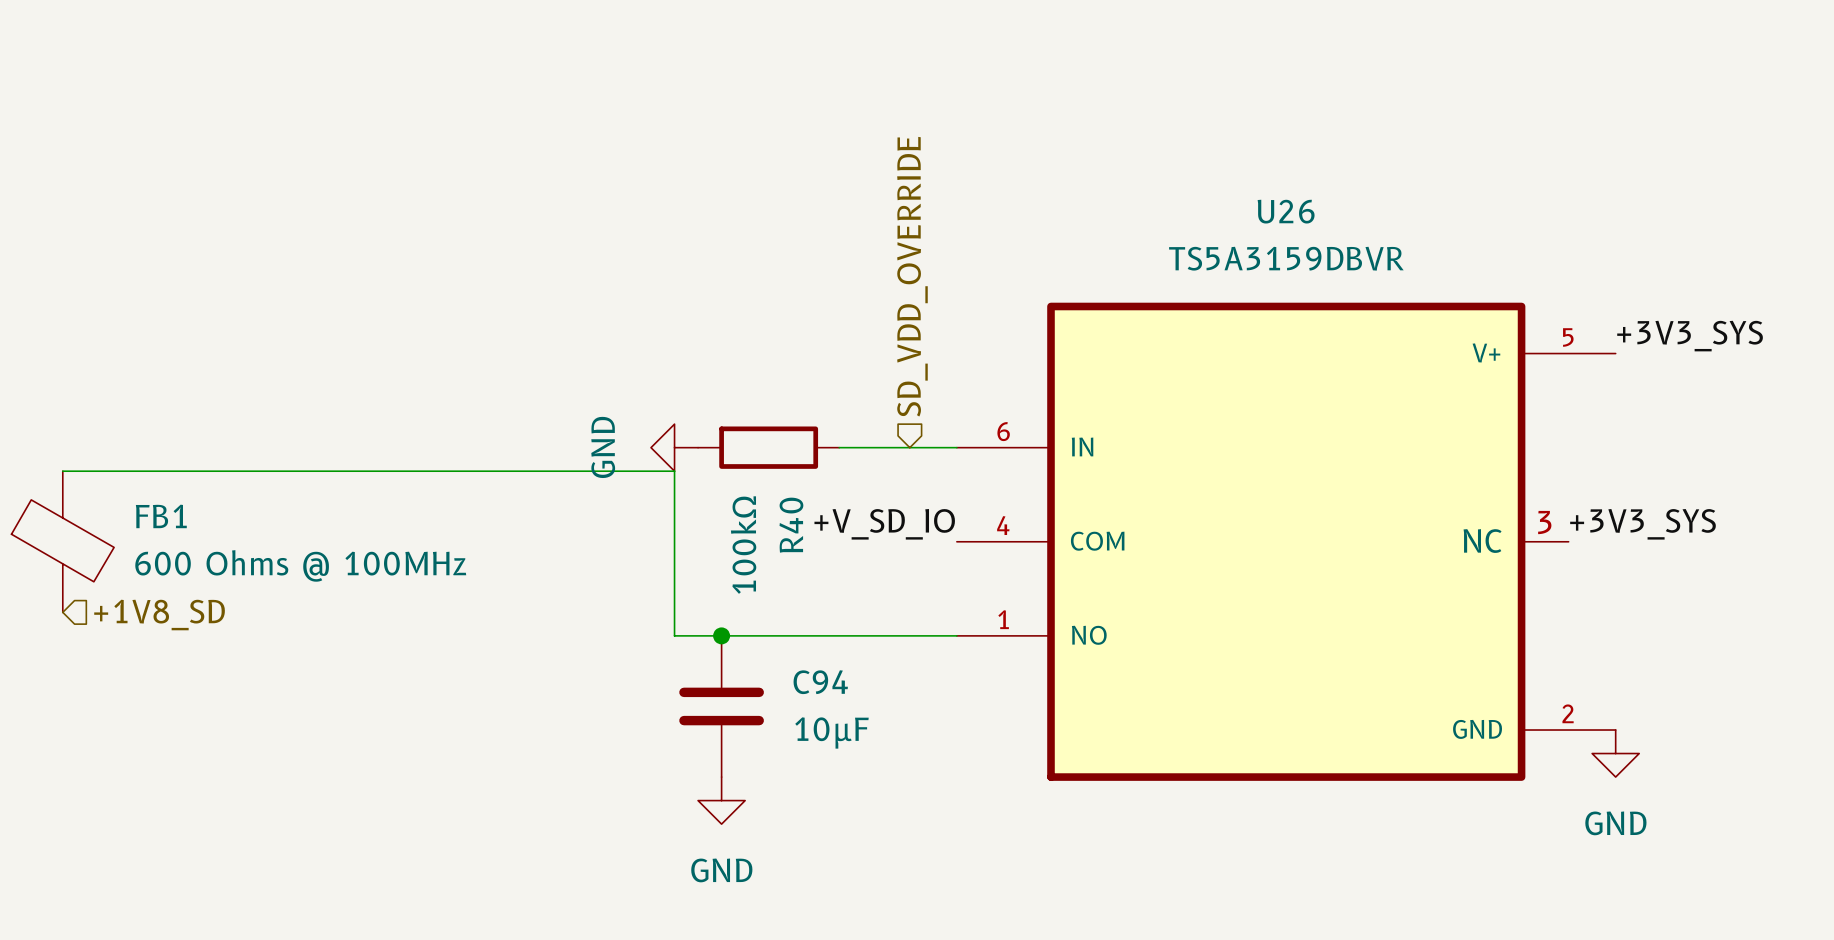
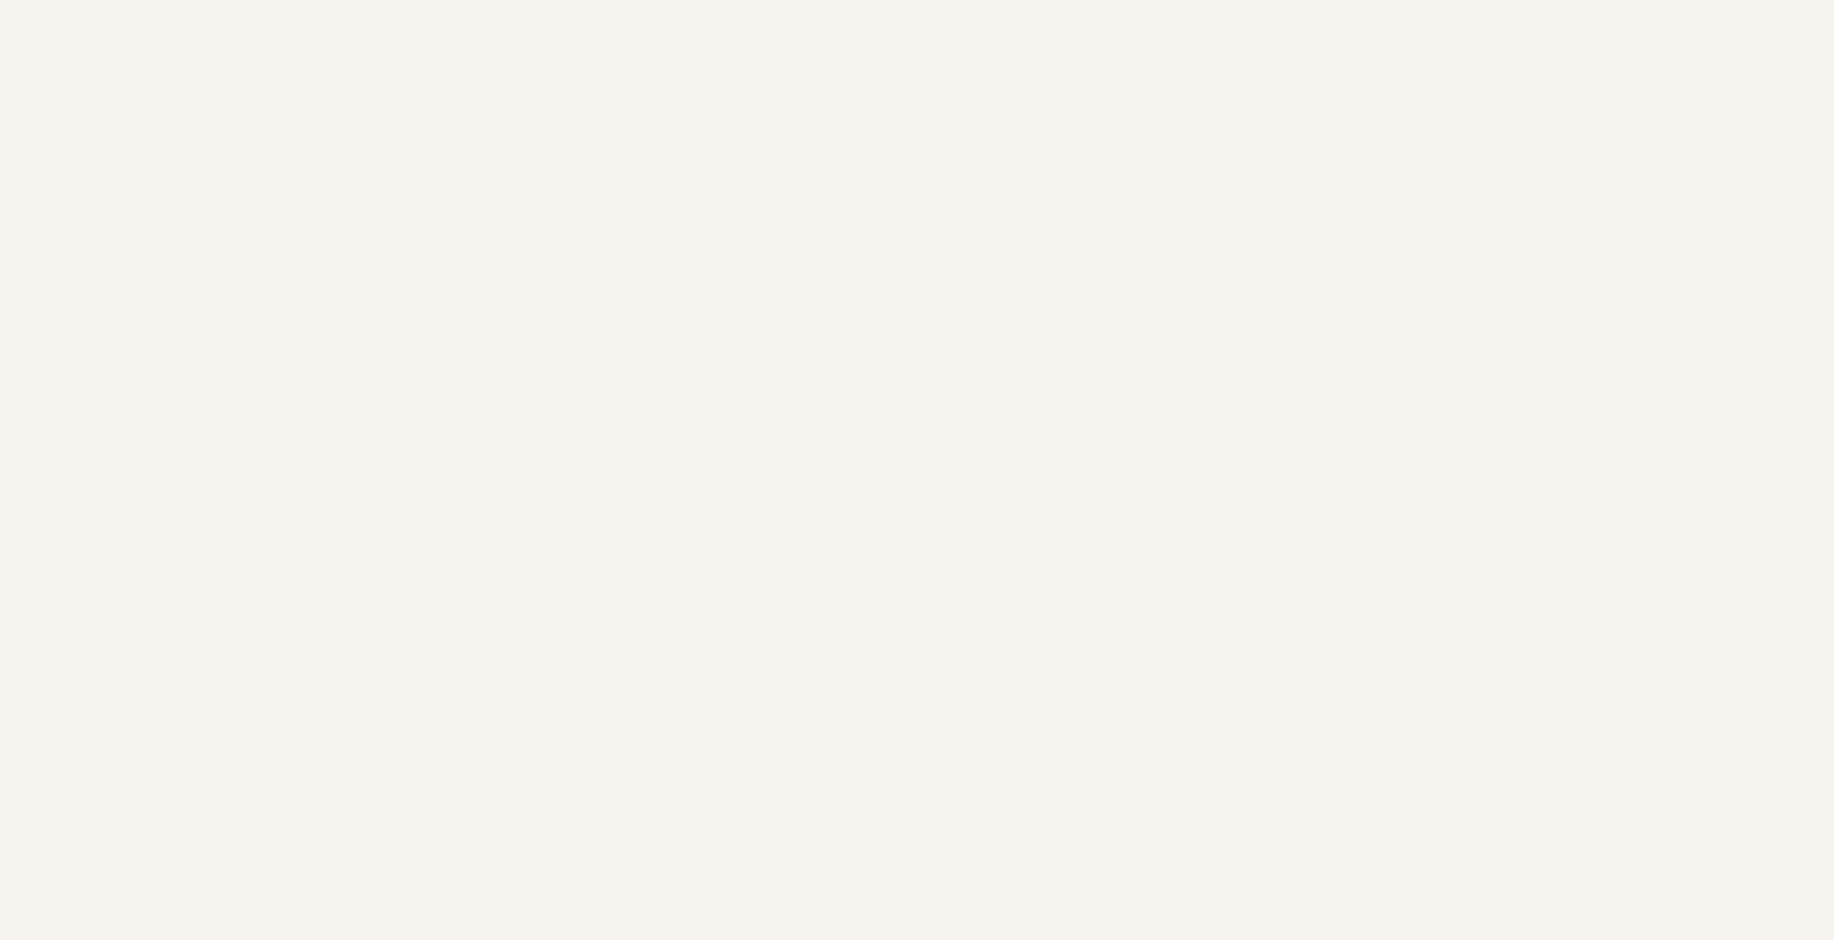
hierarchical label: SD_VDD_OVERRIDE (912, 276) -> none
label: +3V3_SYS (1690, 336) -> none
power symbol: GND (674, 447) -> none
R40: 100kΩ (768, 447) -> none
wire: (839, 447) (956, 447) -> none
wire: (62, 471) (674, 471) (674, 635) (956, 635) -> none
label: +V_SD_IO (884, 524) -> none
label: +3V3_SYS (1642, 524) -> none
FB1: 600 Ohms @ 100MHz (62, 541) -> none
U26: TS5A3159DBVR (1286, 541) -> none
hierarchical label: +1V8_SD (159, 615) -> none
junction: (721, 635) -> none
C94: 10µF (721, 706) -> none
power symbol: GND (1615, 753) -> none
power symbol: GND (721, 800) -> none

